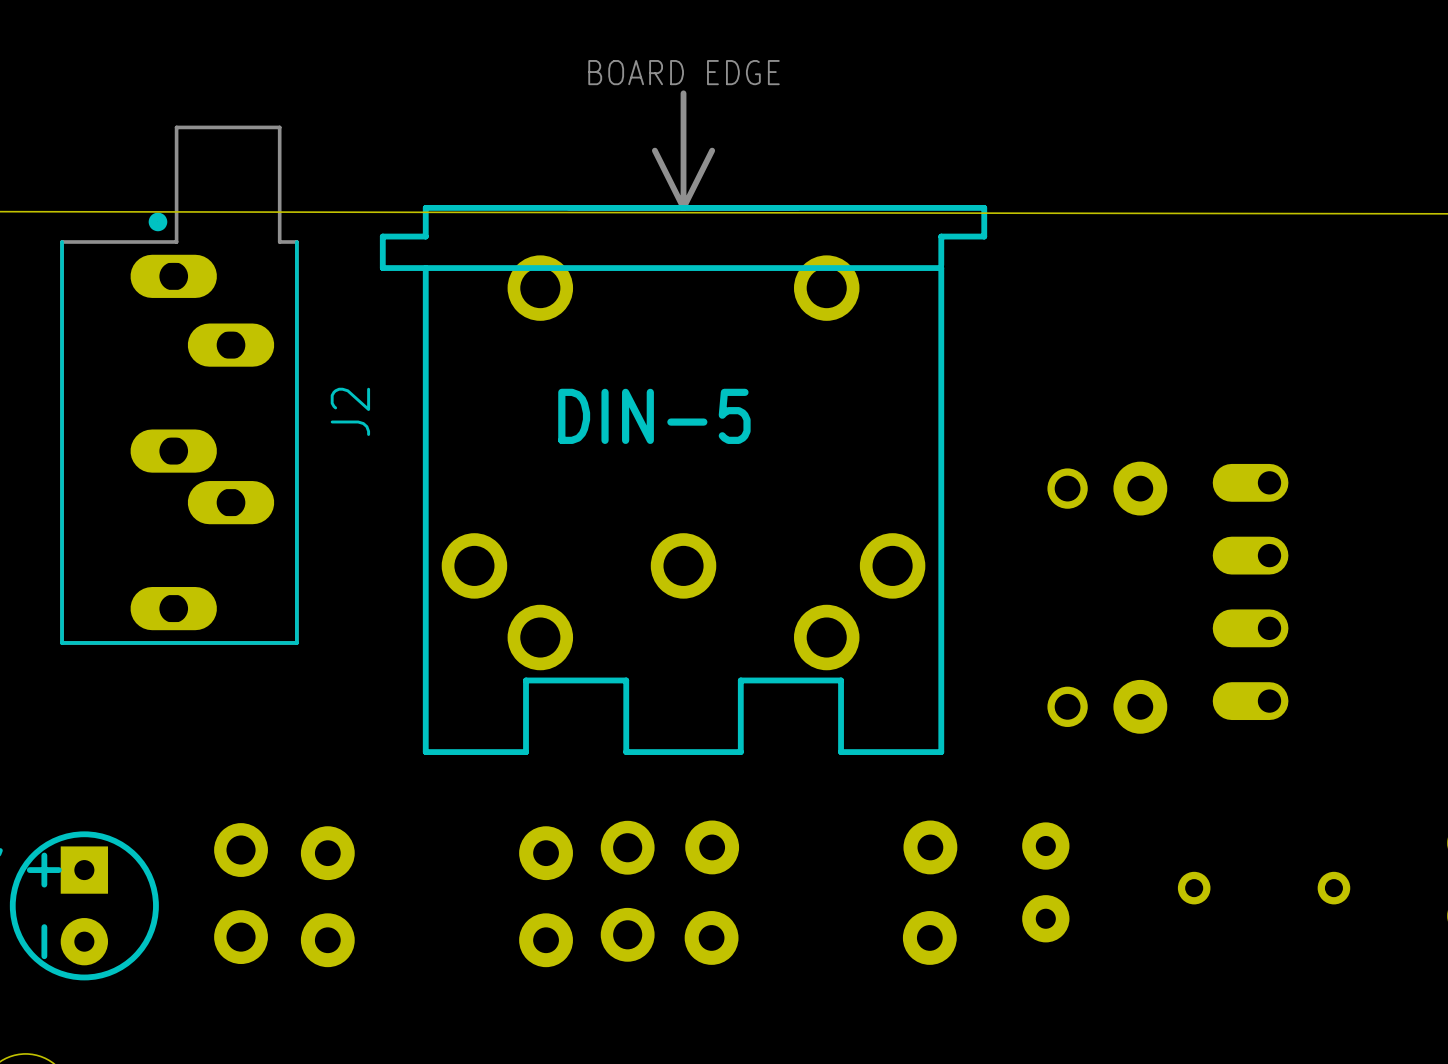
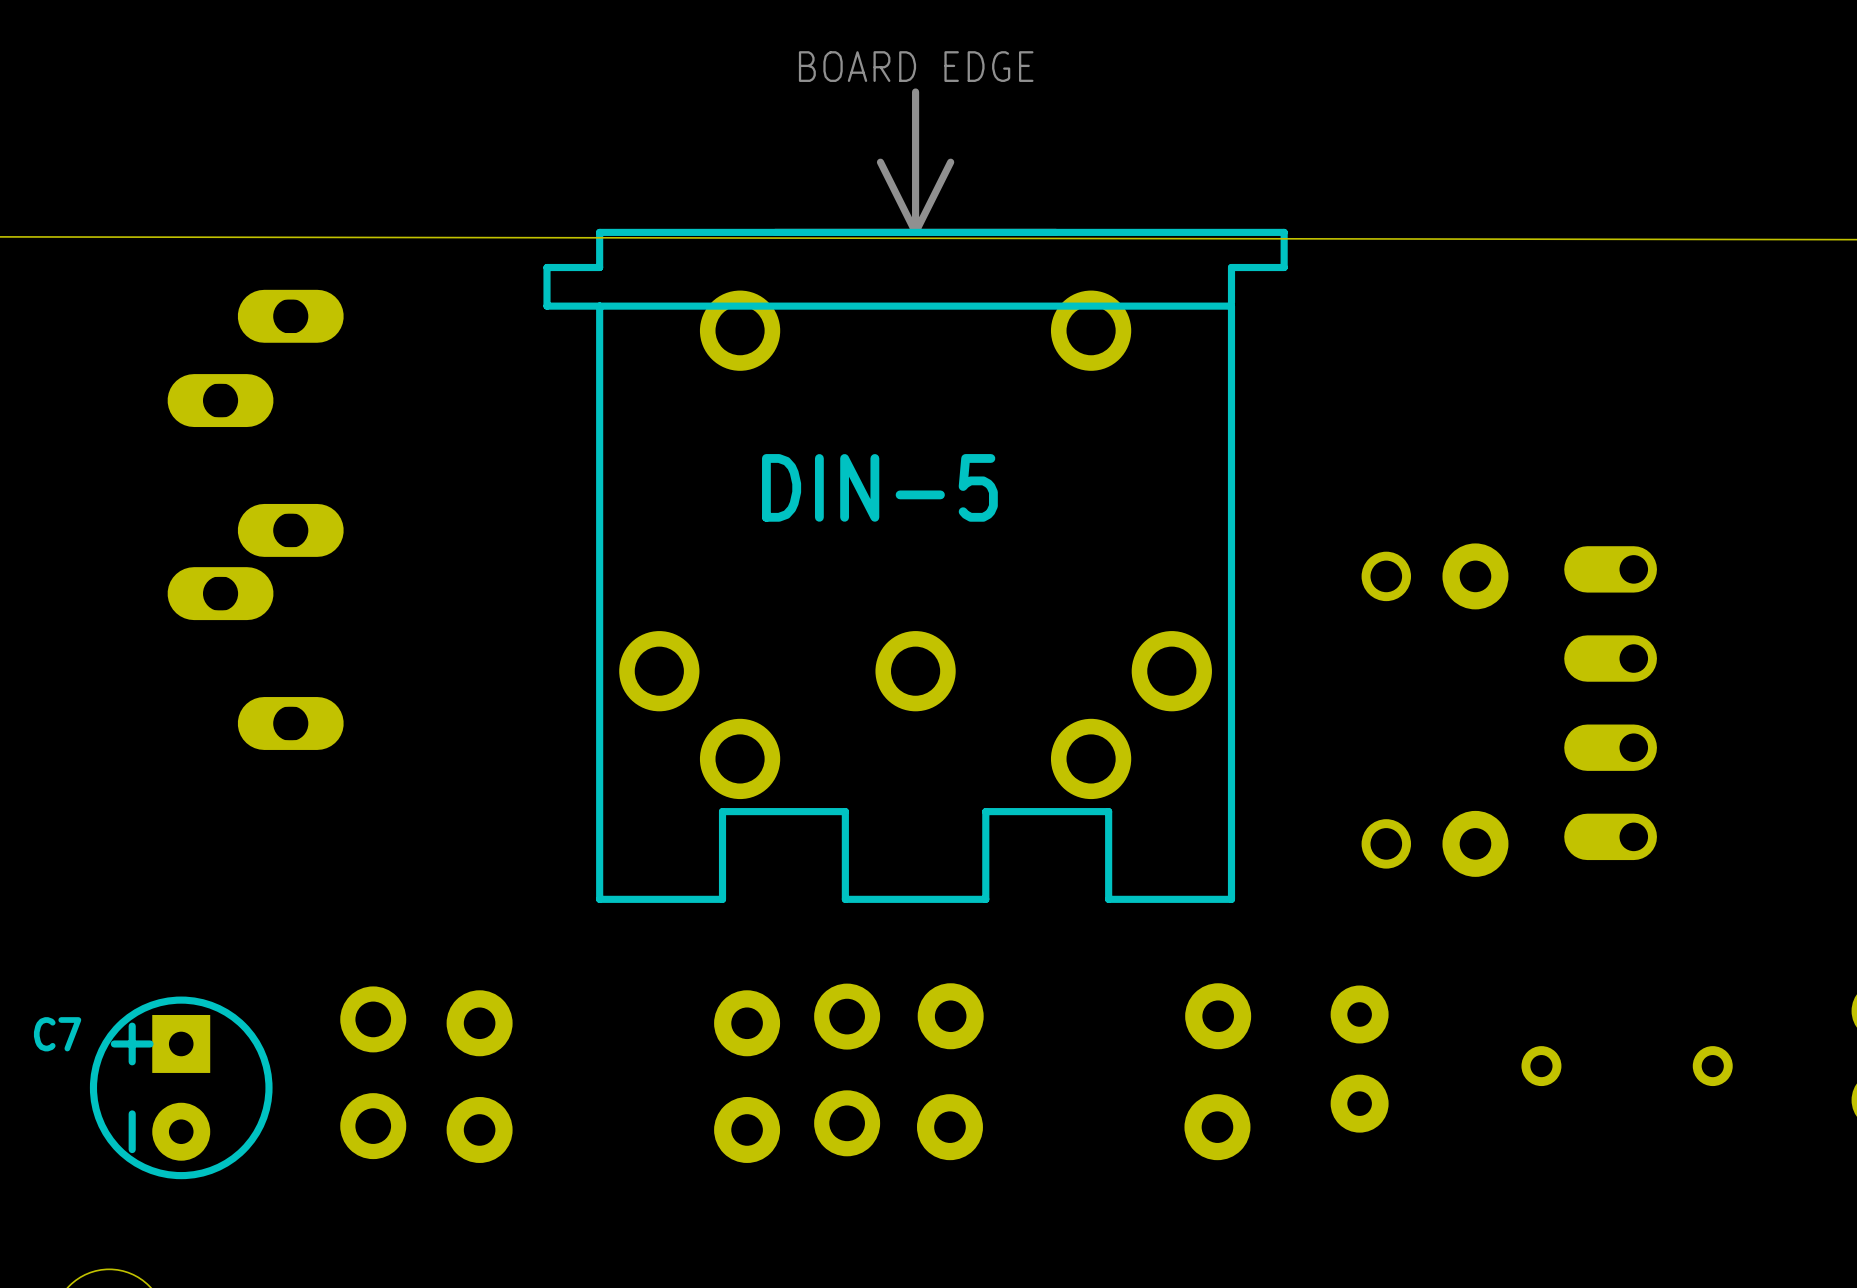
J2 side: bottom (179, 385) -> top (255, 519)

